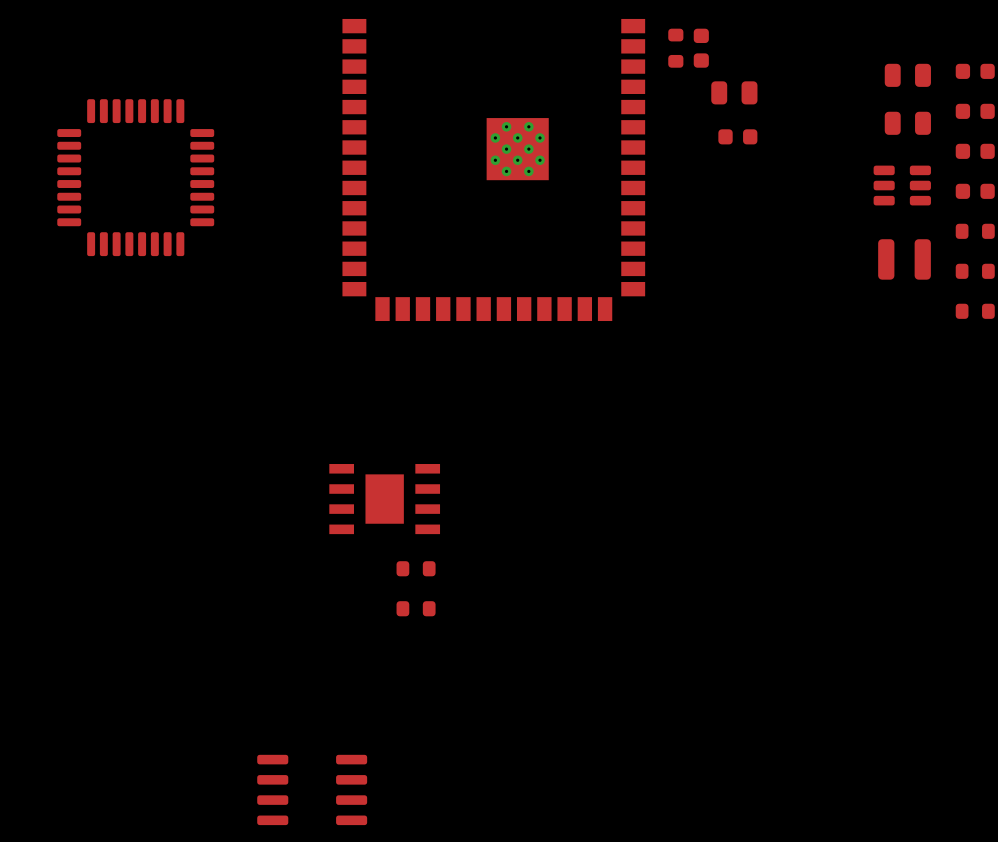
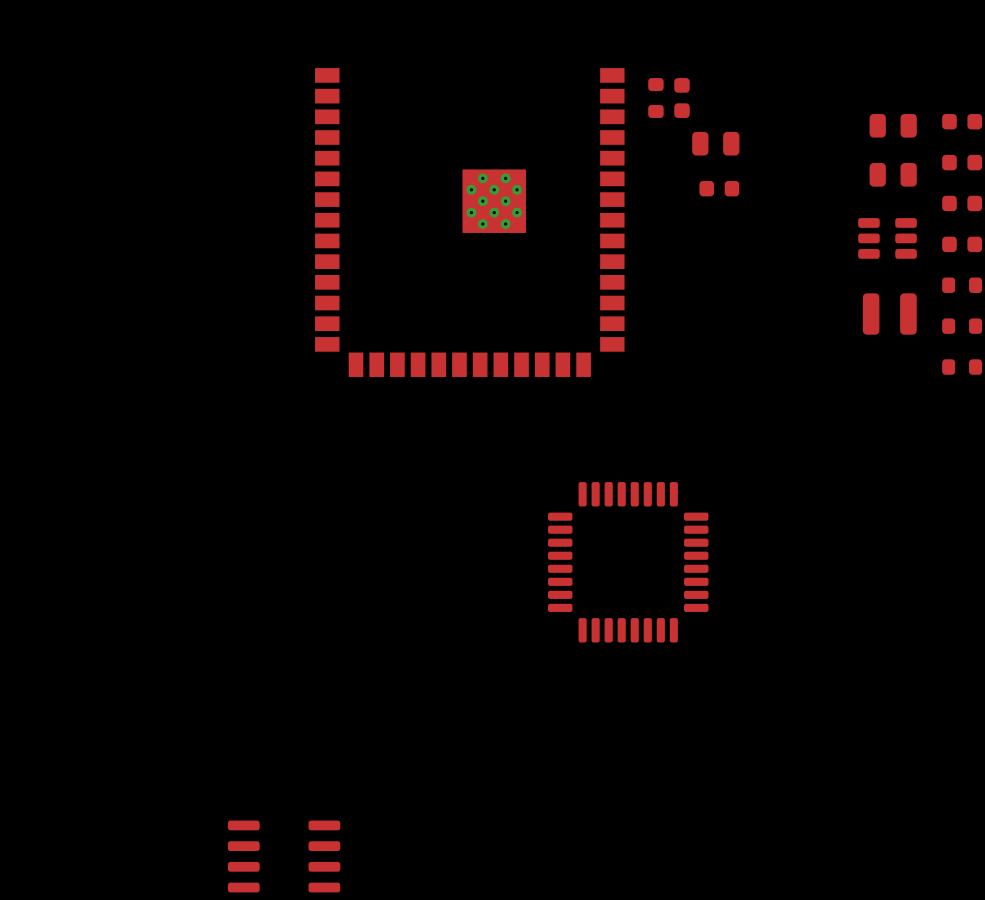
part: (135, 177) -> none
part: (384, 499) -> none
part: none -> (628, 562)
part: (416, 568) -> none
part: (416, 608) -> none

